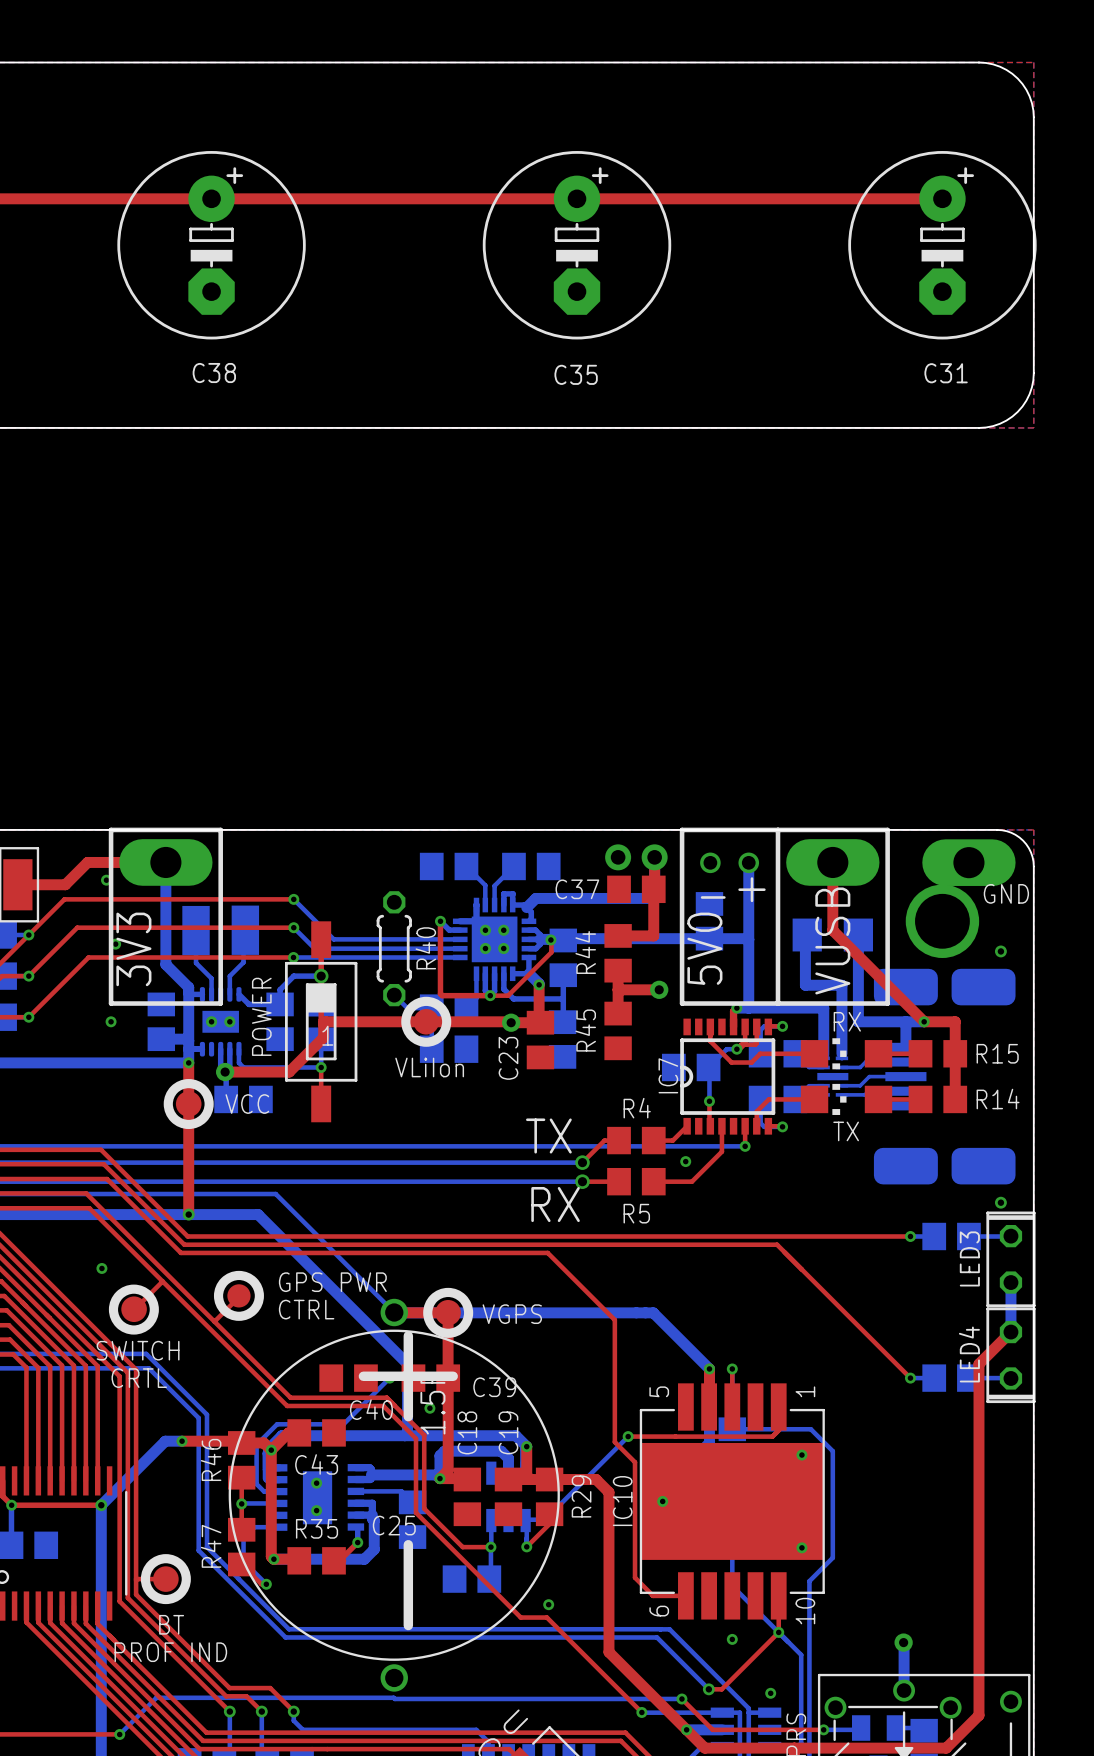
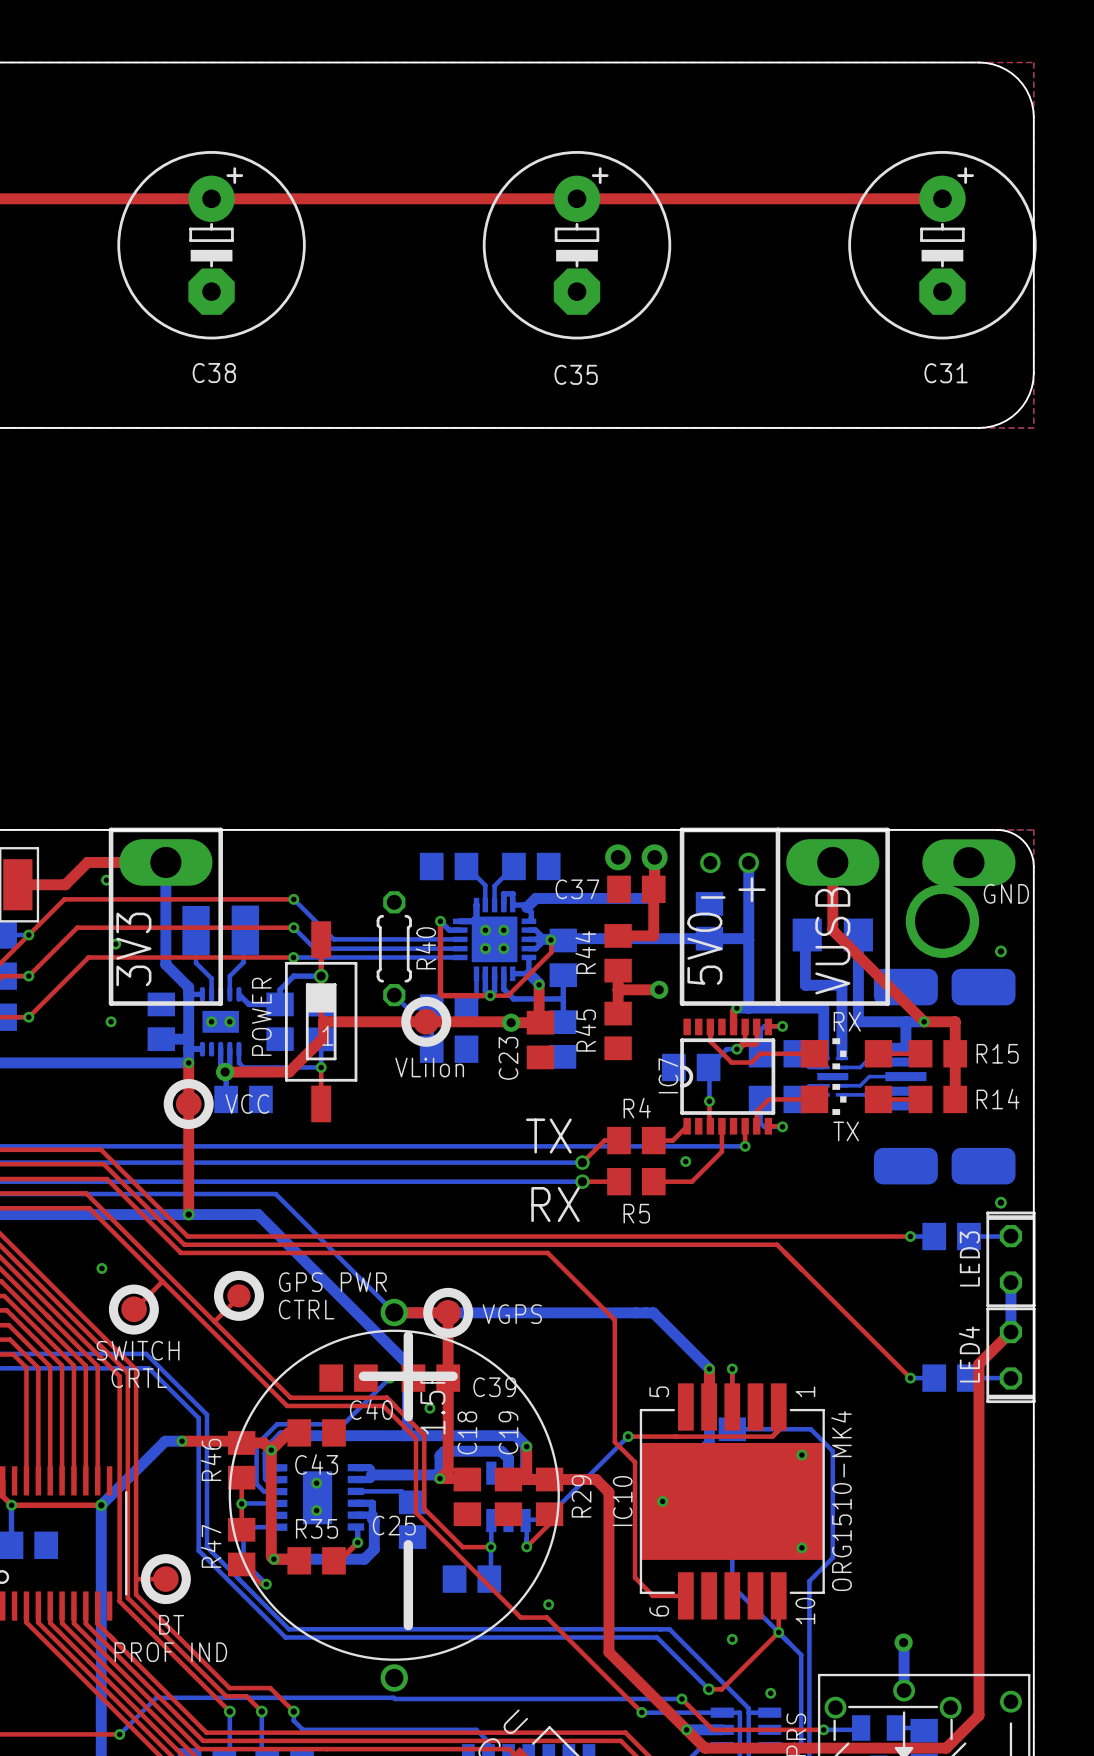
IC10 value: none -> ORG1510-MK4 (841, 1501)

